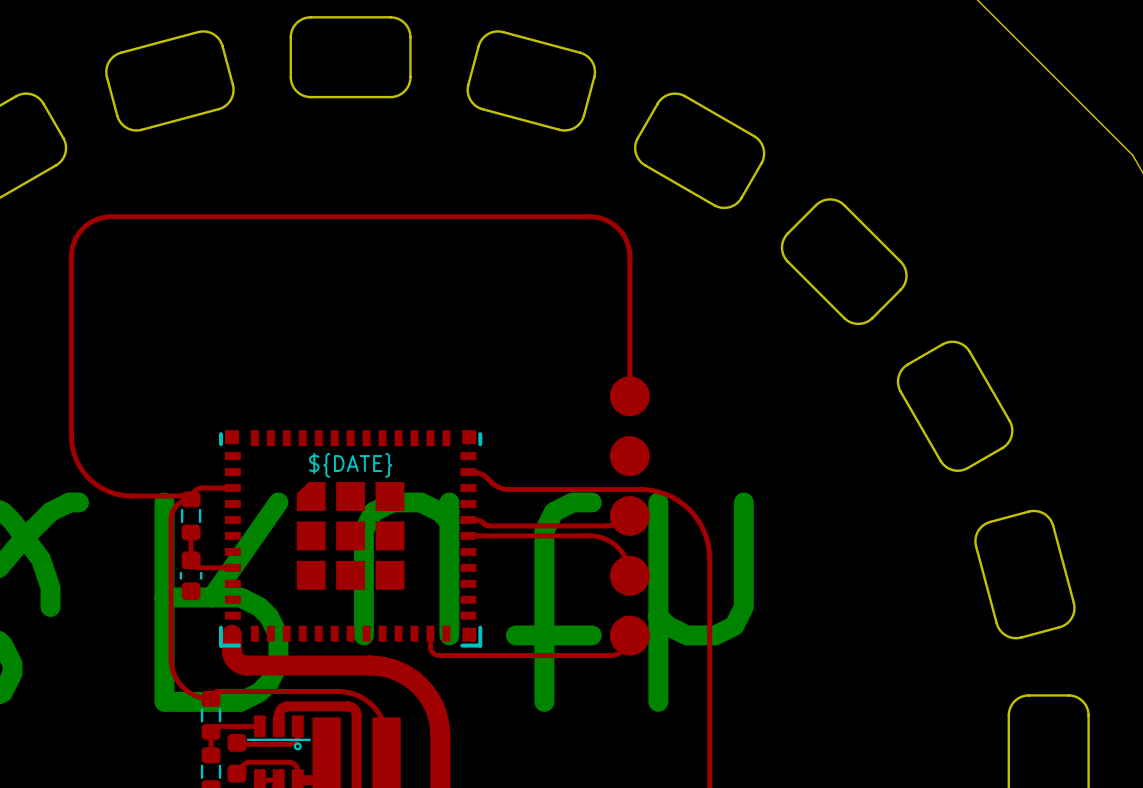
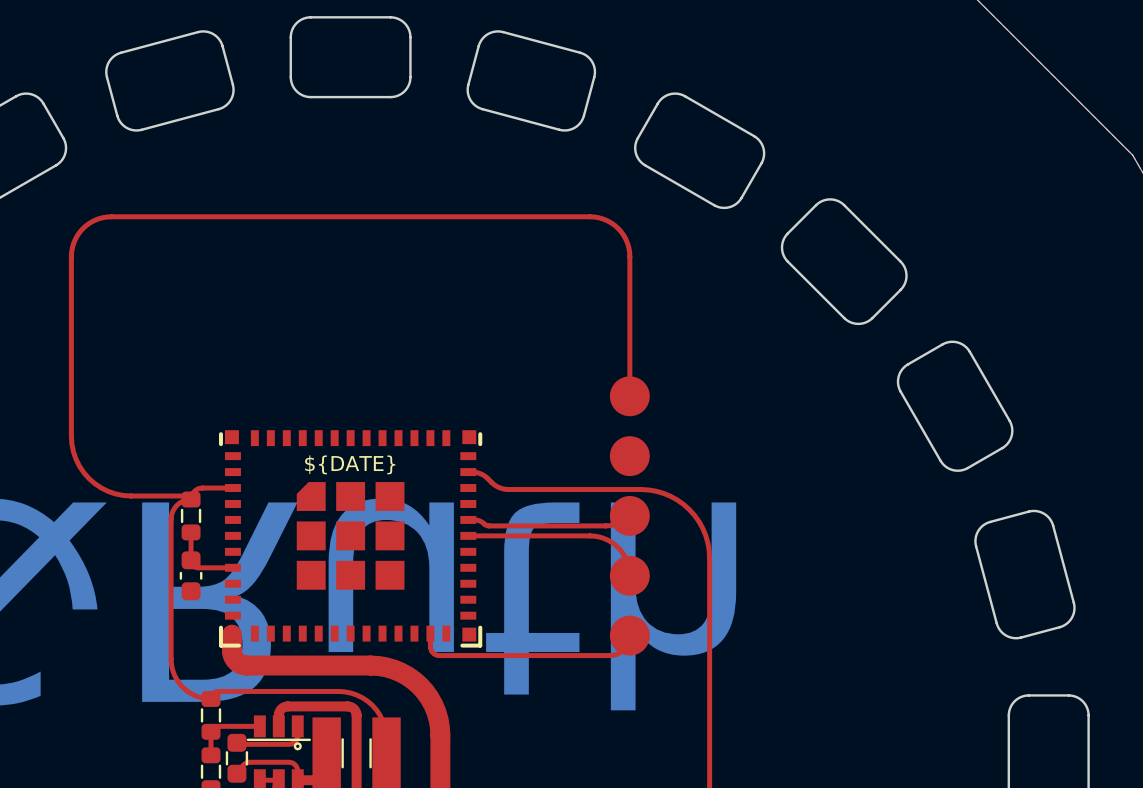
drawing: none -> [341, 738, 372, 769]
drawing: none -> [225, 751, 249, 766]

